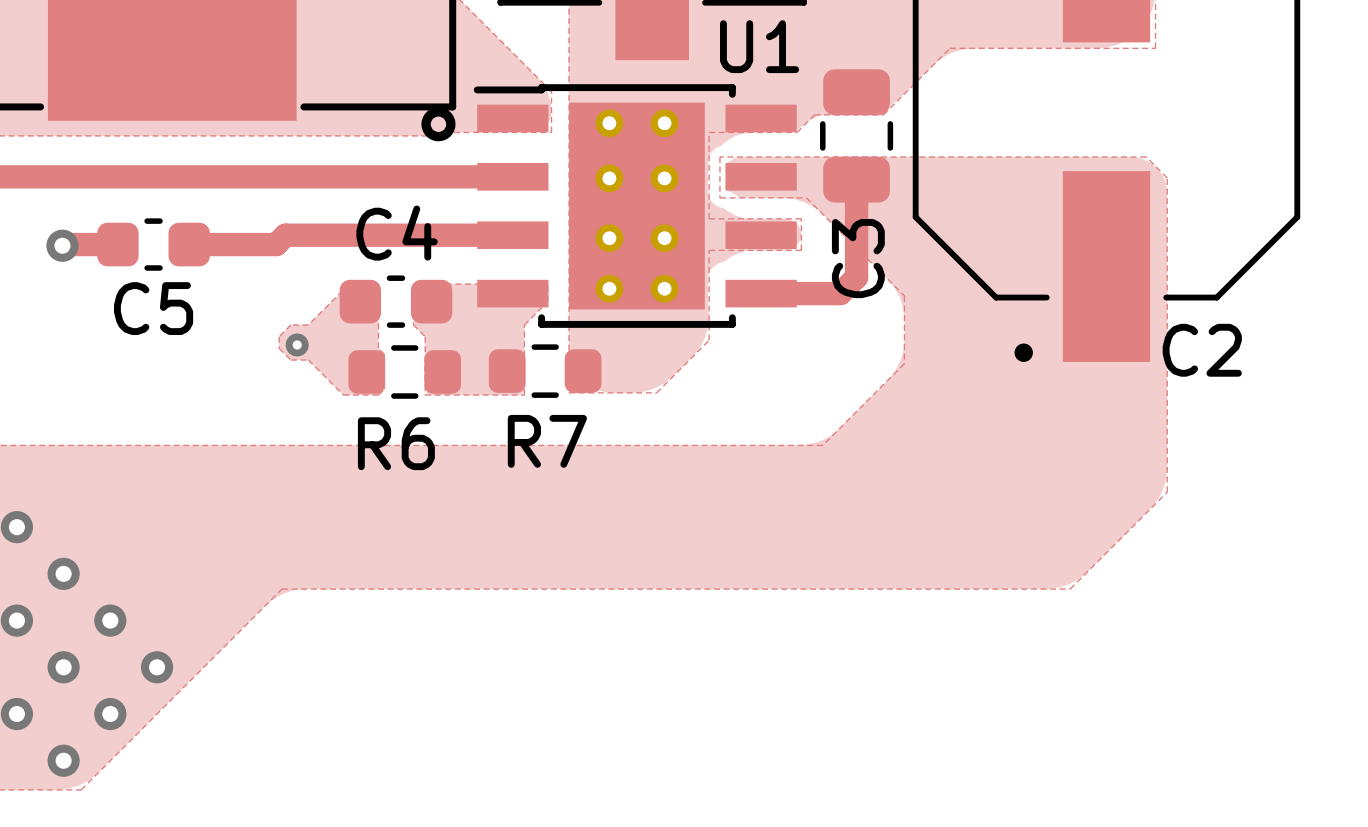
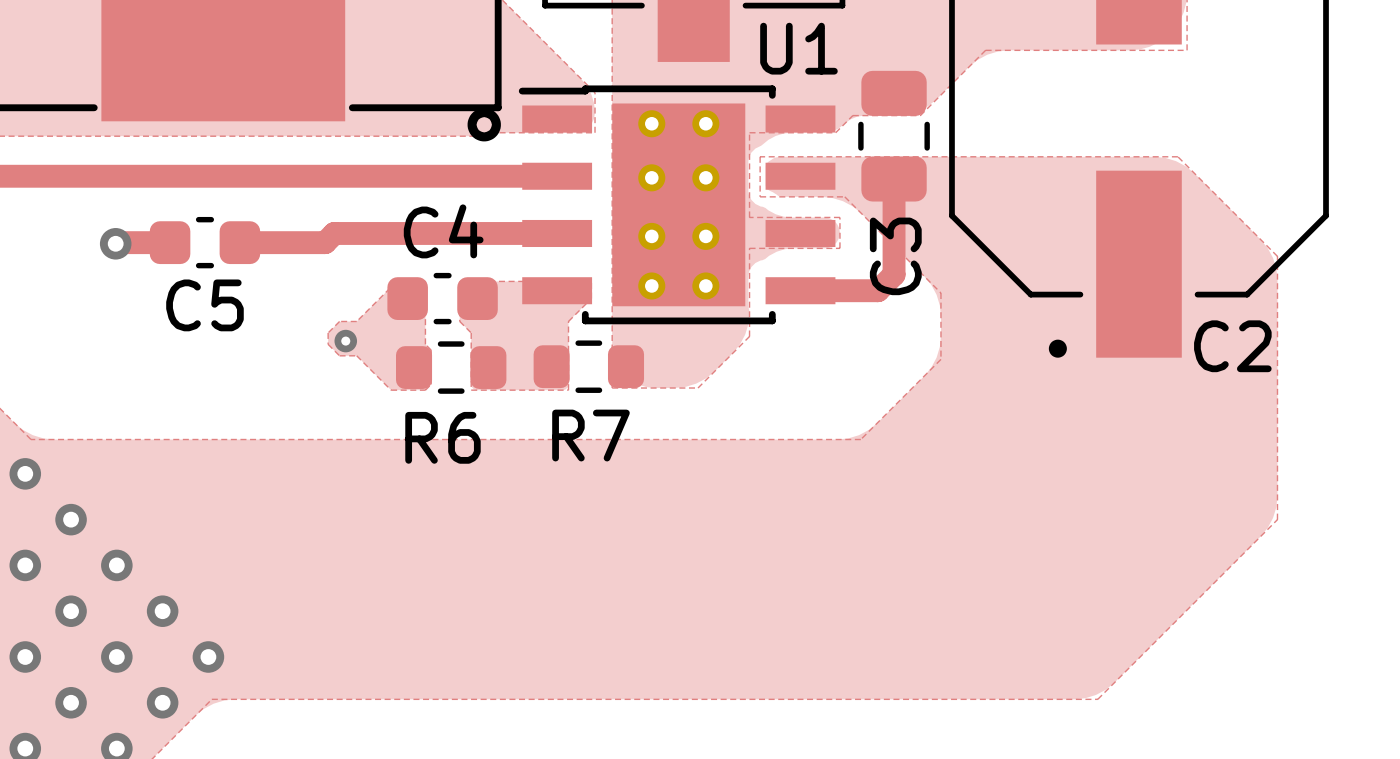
zone outline: (1167, 177) (1167, 492) (1070, 589) (282, 589) (160, 710) -> (1198, 177) (1277, 256) (1277, 519) (1097, 699) (211, 699)

